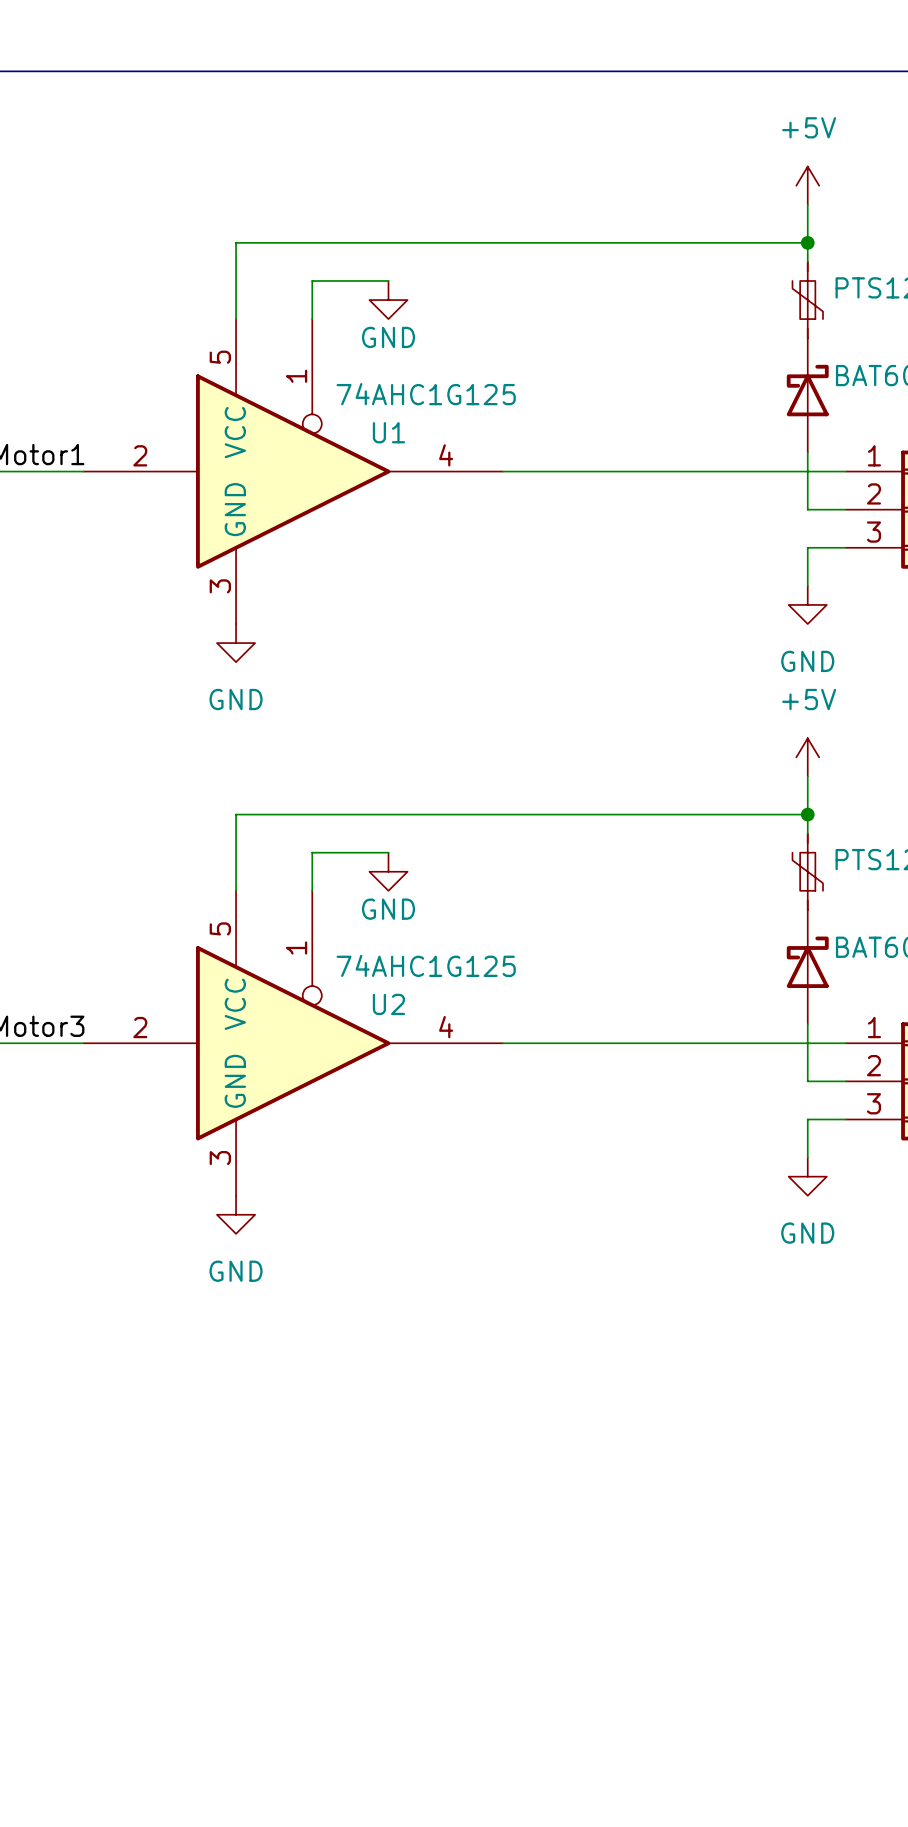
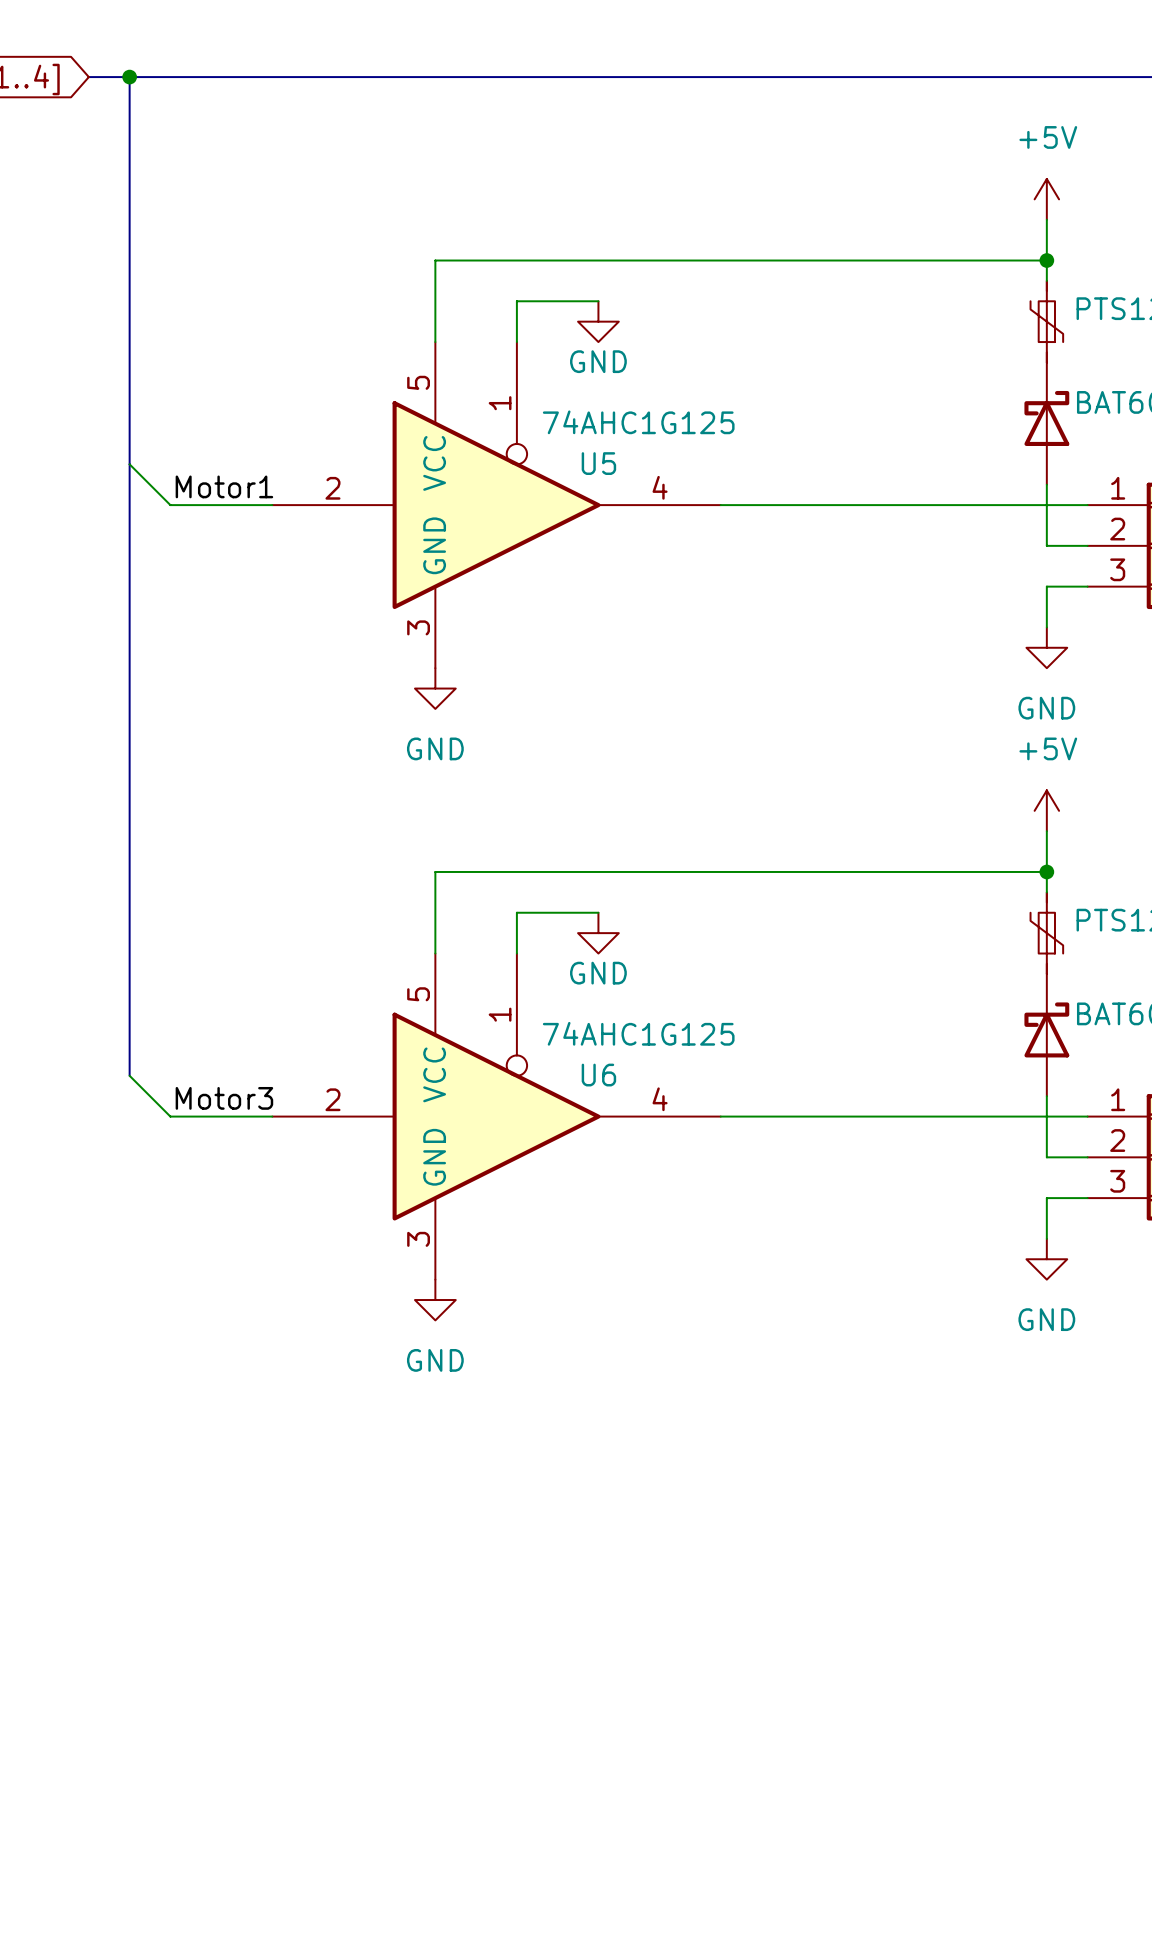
U1 name: U1 (388, 432) -> U5 (598, 463)
U2 name: U2 (388, 1004) -> U6 (598, 1075)

